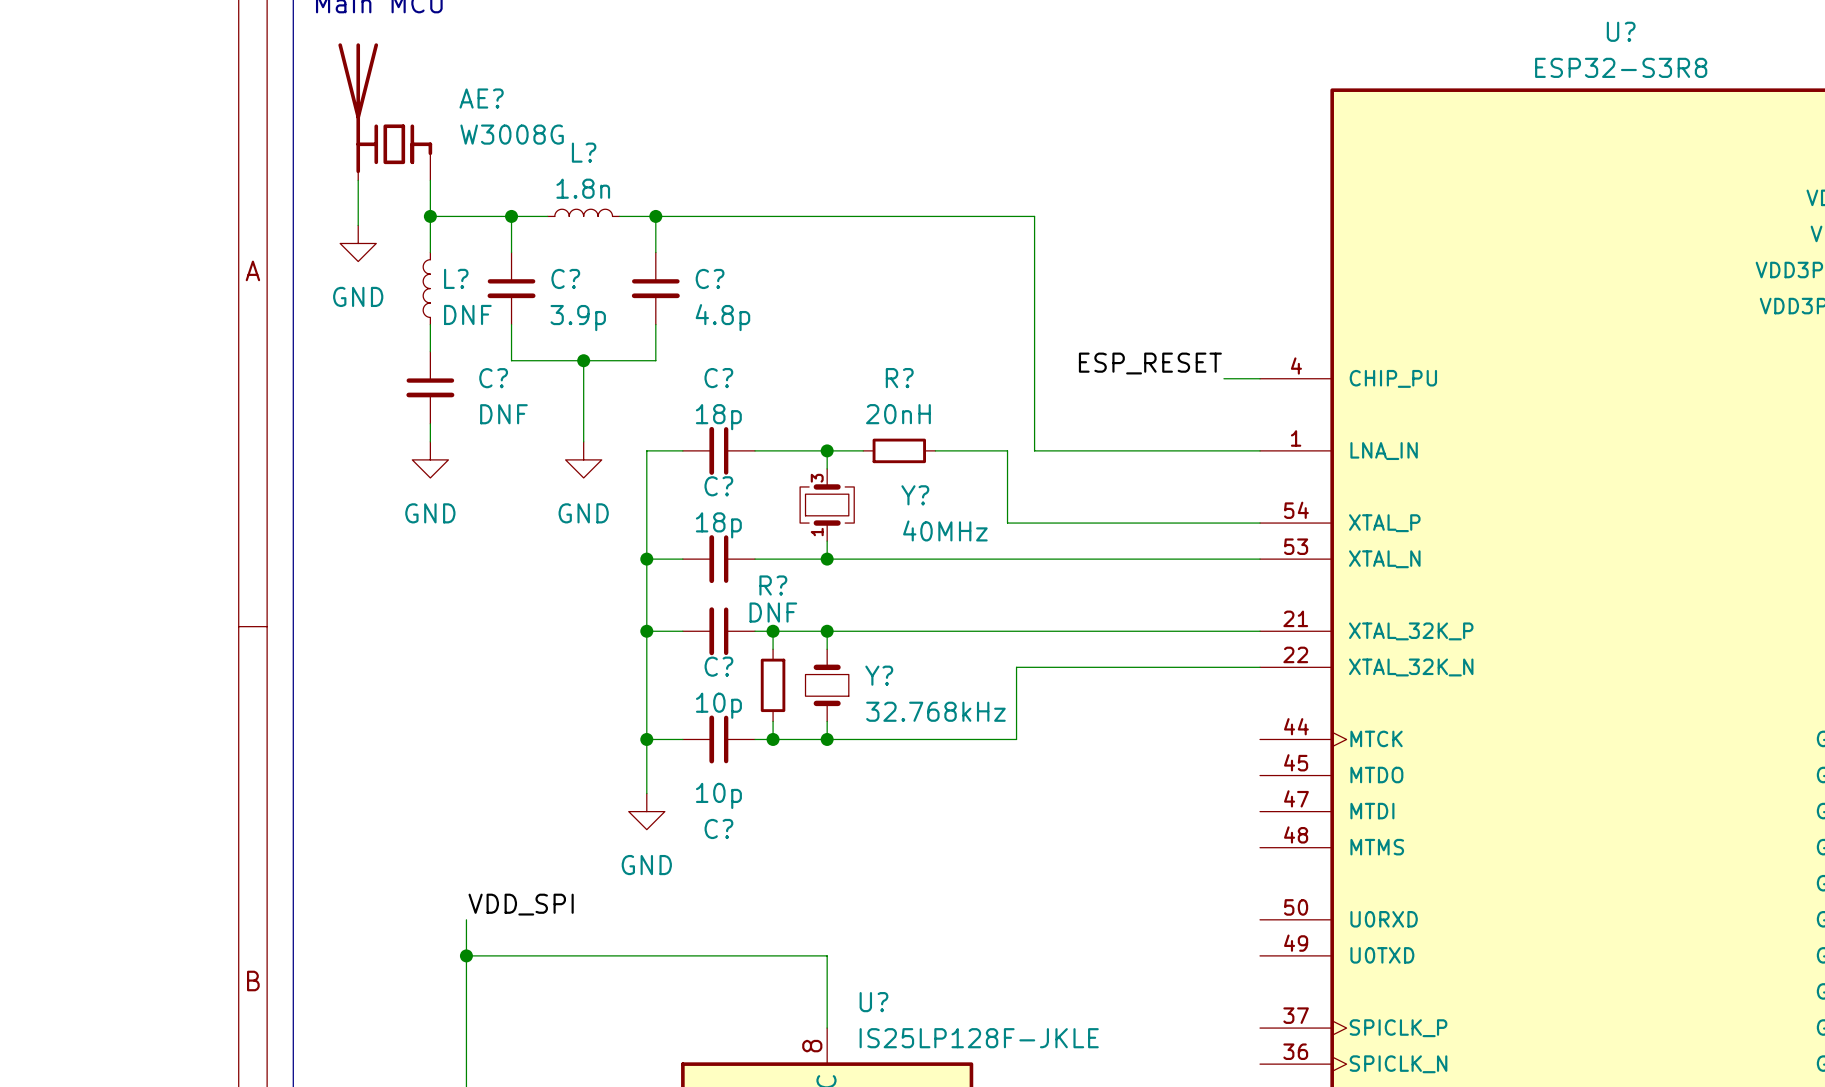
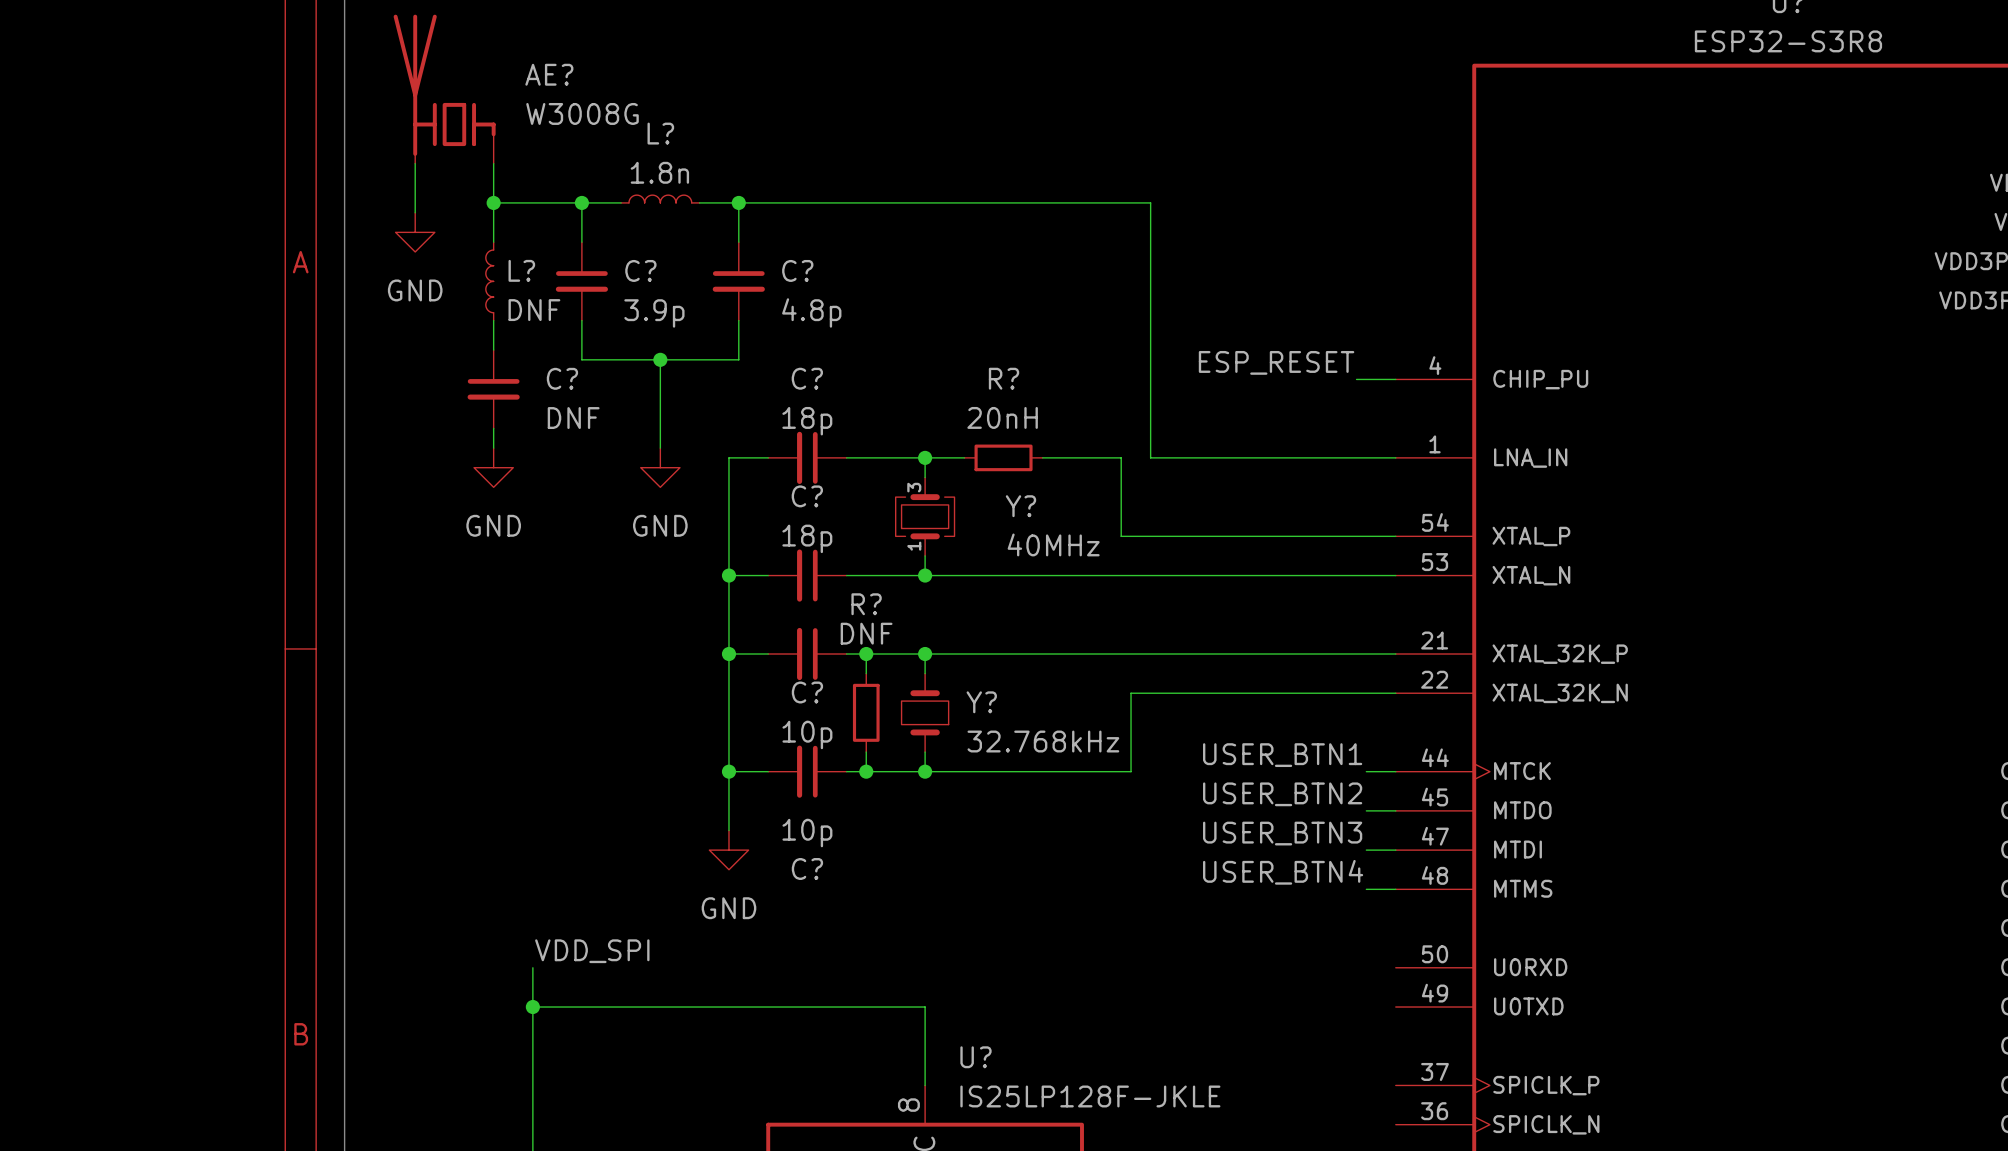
label: none -> USER_BTN1 (1282, 755)
wire: none -> (1366, 771) (1395, 771)
label: none -> USER_BTN2 (1282, 794)
wire: none -> (1366, 810) (1395, 810)
label: none -> USER_BTN3 (1282, 833)
wire: none -> (1366, 850) (1395, 850)
label: none -> USER_BTN4 (1283, 872)
wire: none -> (1366, 889) (1395, 889)

